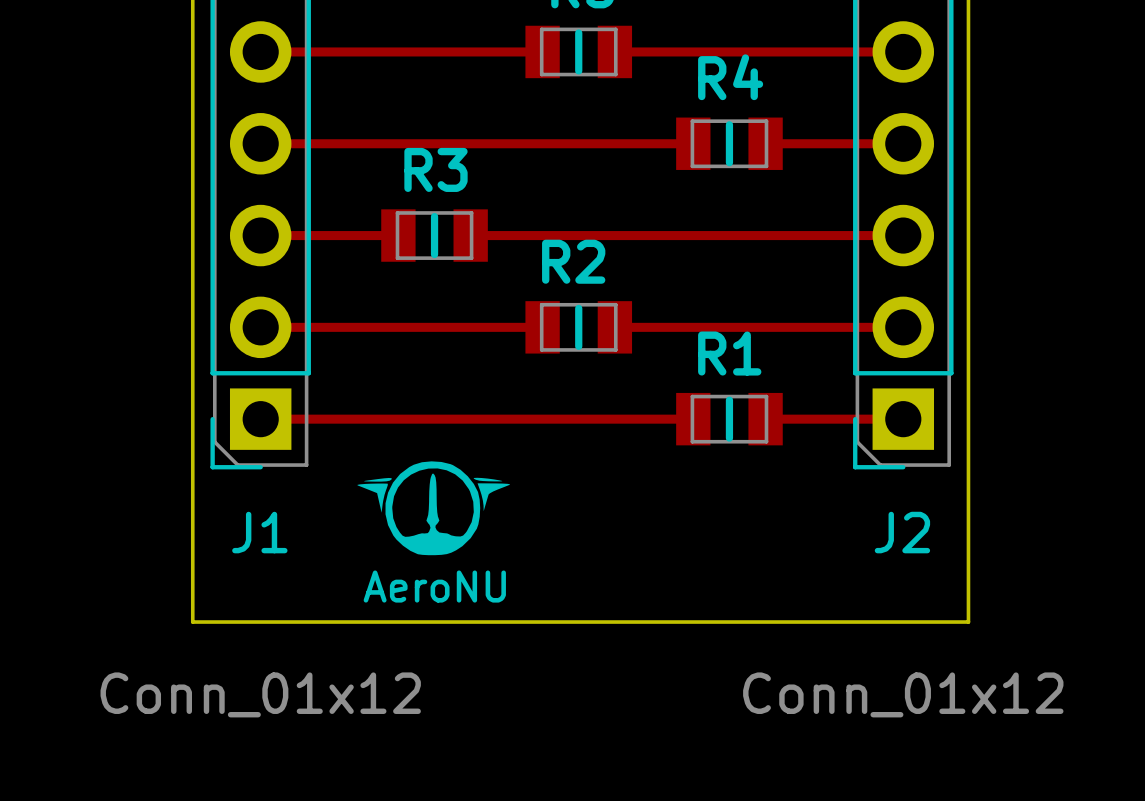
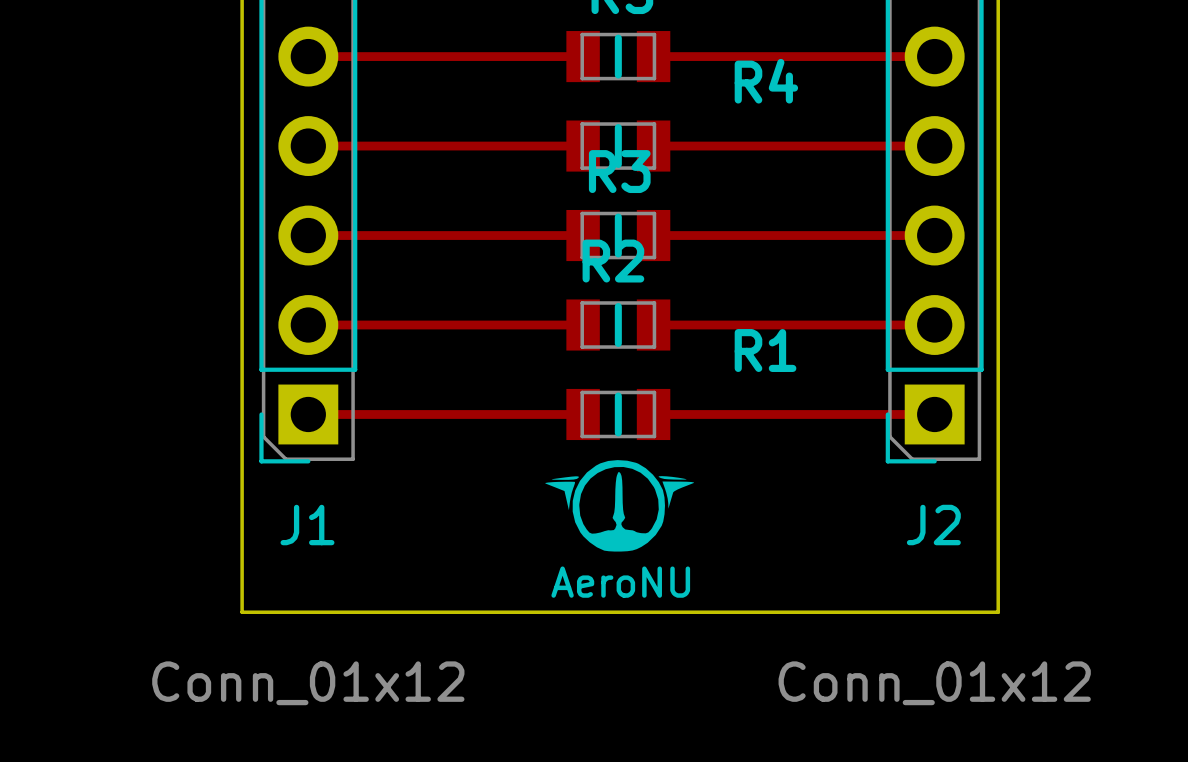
track: (542, 143) (614, 143) -> (730, 146) (800, 146)
R4 position: (729, 143) -> (618, 146)
R3 position: (434, 235) -> (618, 235)
track: (542, 235) (614, 235) -> (442, 235) (513, 235)
track: (542, 419) (614, 419) -> (730, 414) (800, 414)
R1 position: (729, 419) -> (618, 414)
drawing position: (433, 508) -> (619, 505)
text position: AeroNU (434, 586) -> AeroNU (620, 582)

